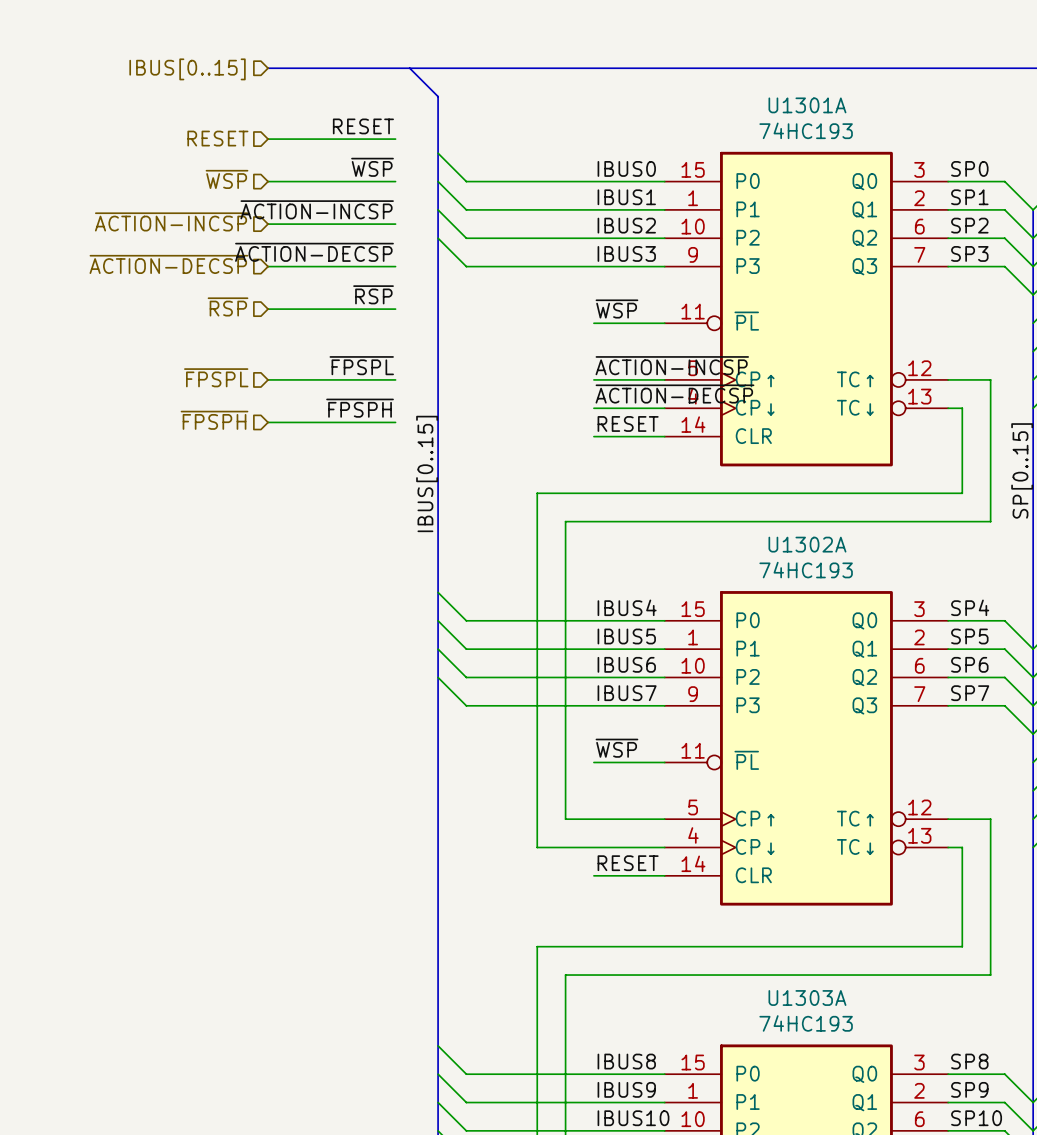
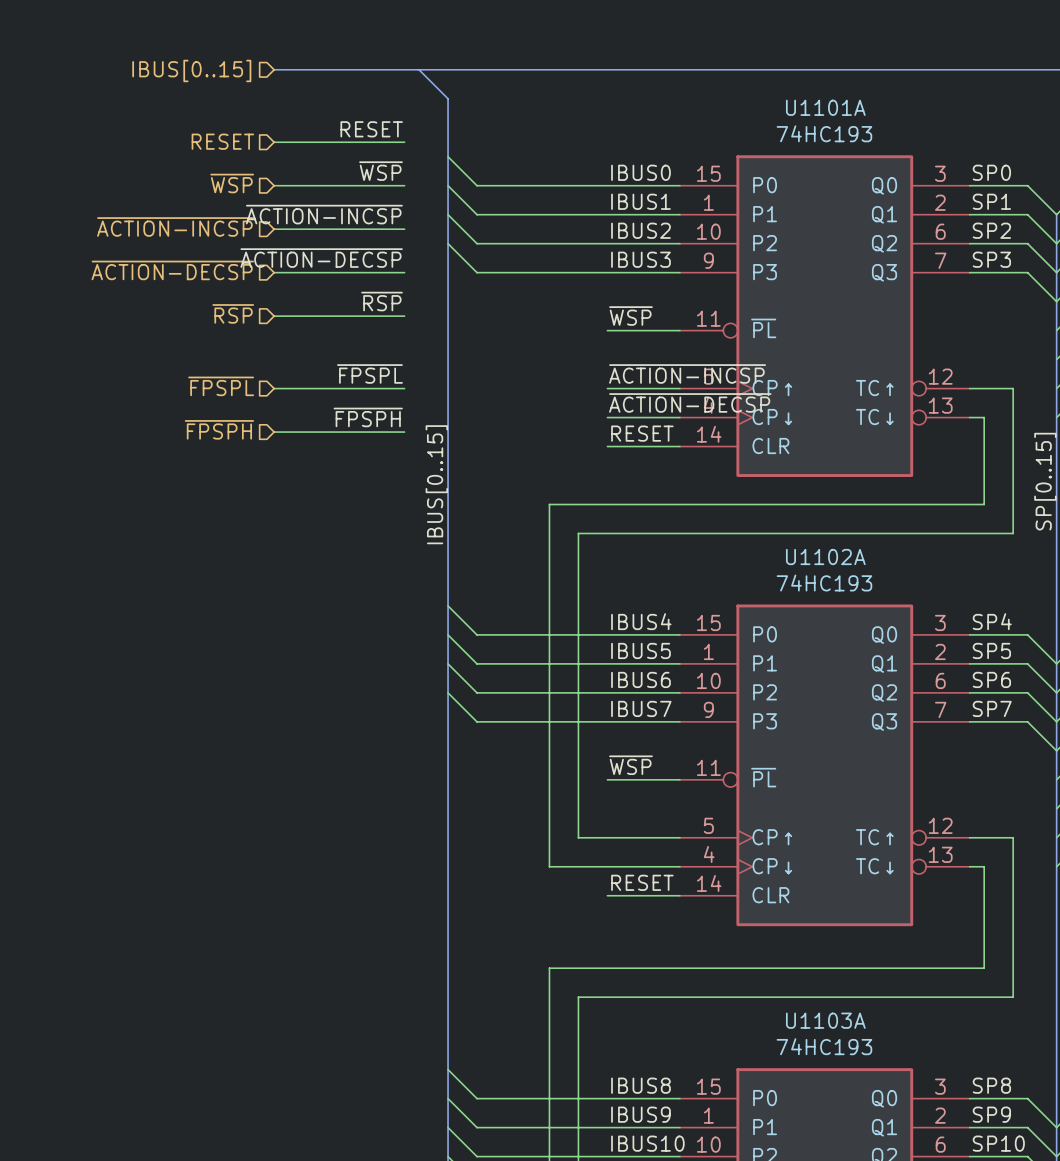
U1301A name: U1301A (807, 105) -> U1101A (825, 107)
U1302A name: U1302A (807, 544) -> U1102A (825, 557)
U1303A name: U1303A (807, 998) -> U1103A (825, 1020)

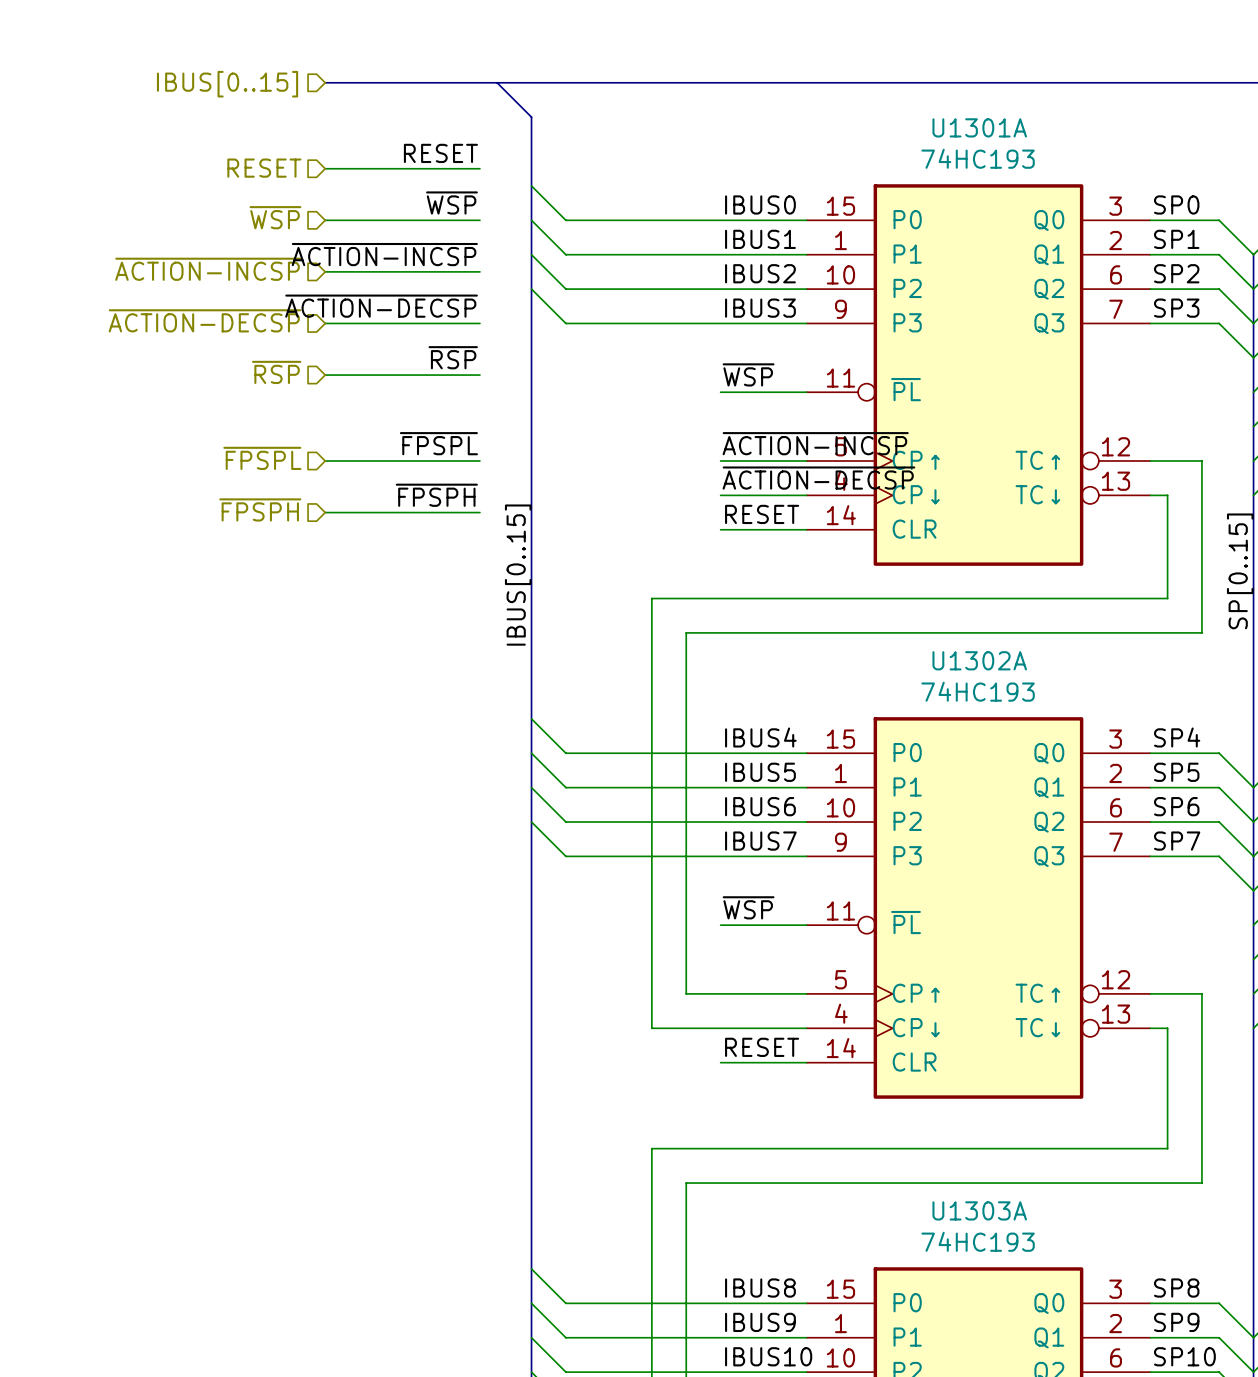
U1101A name: U1101A (825, 107) -> U1301A (979, 127)
U1102A name: U1102A (825, 557) -> U1302A (979, 660)
U1103A name: U1103A (825, 1020) -> U1303A (979, 1210)

